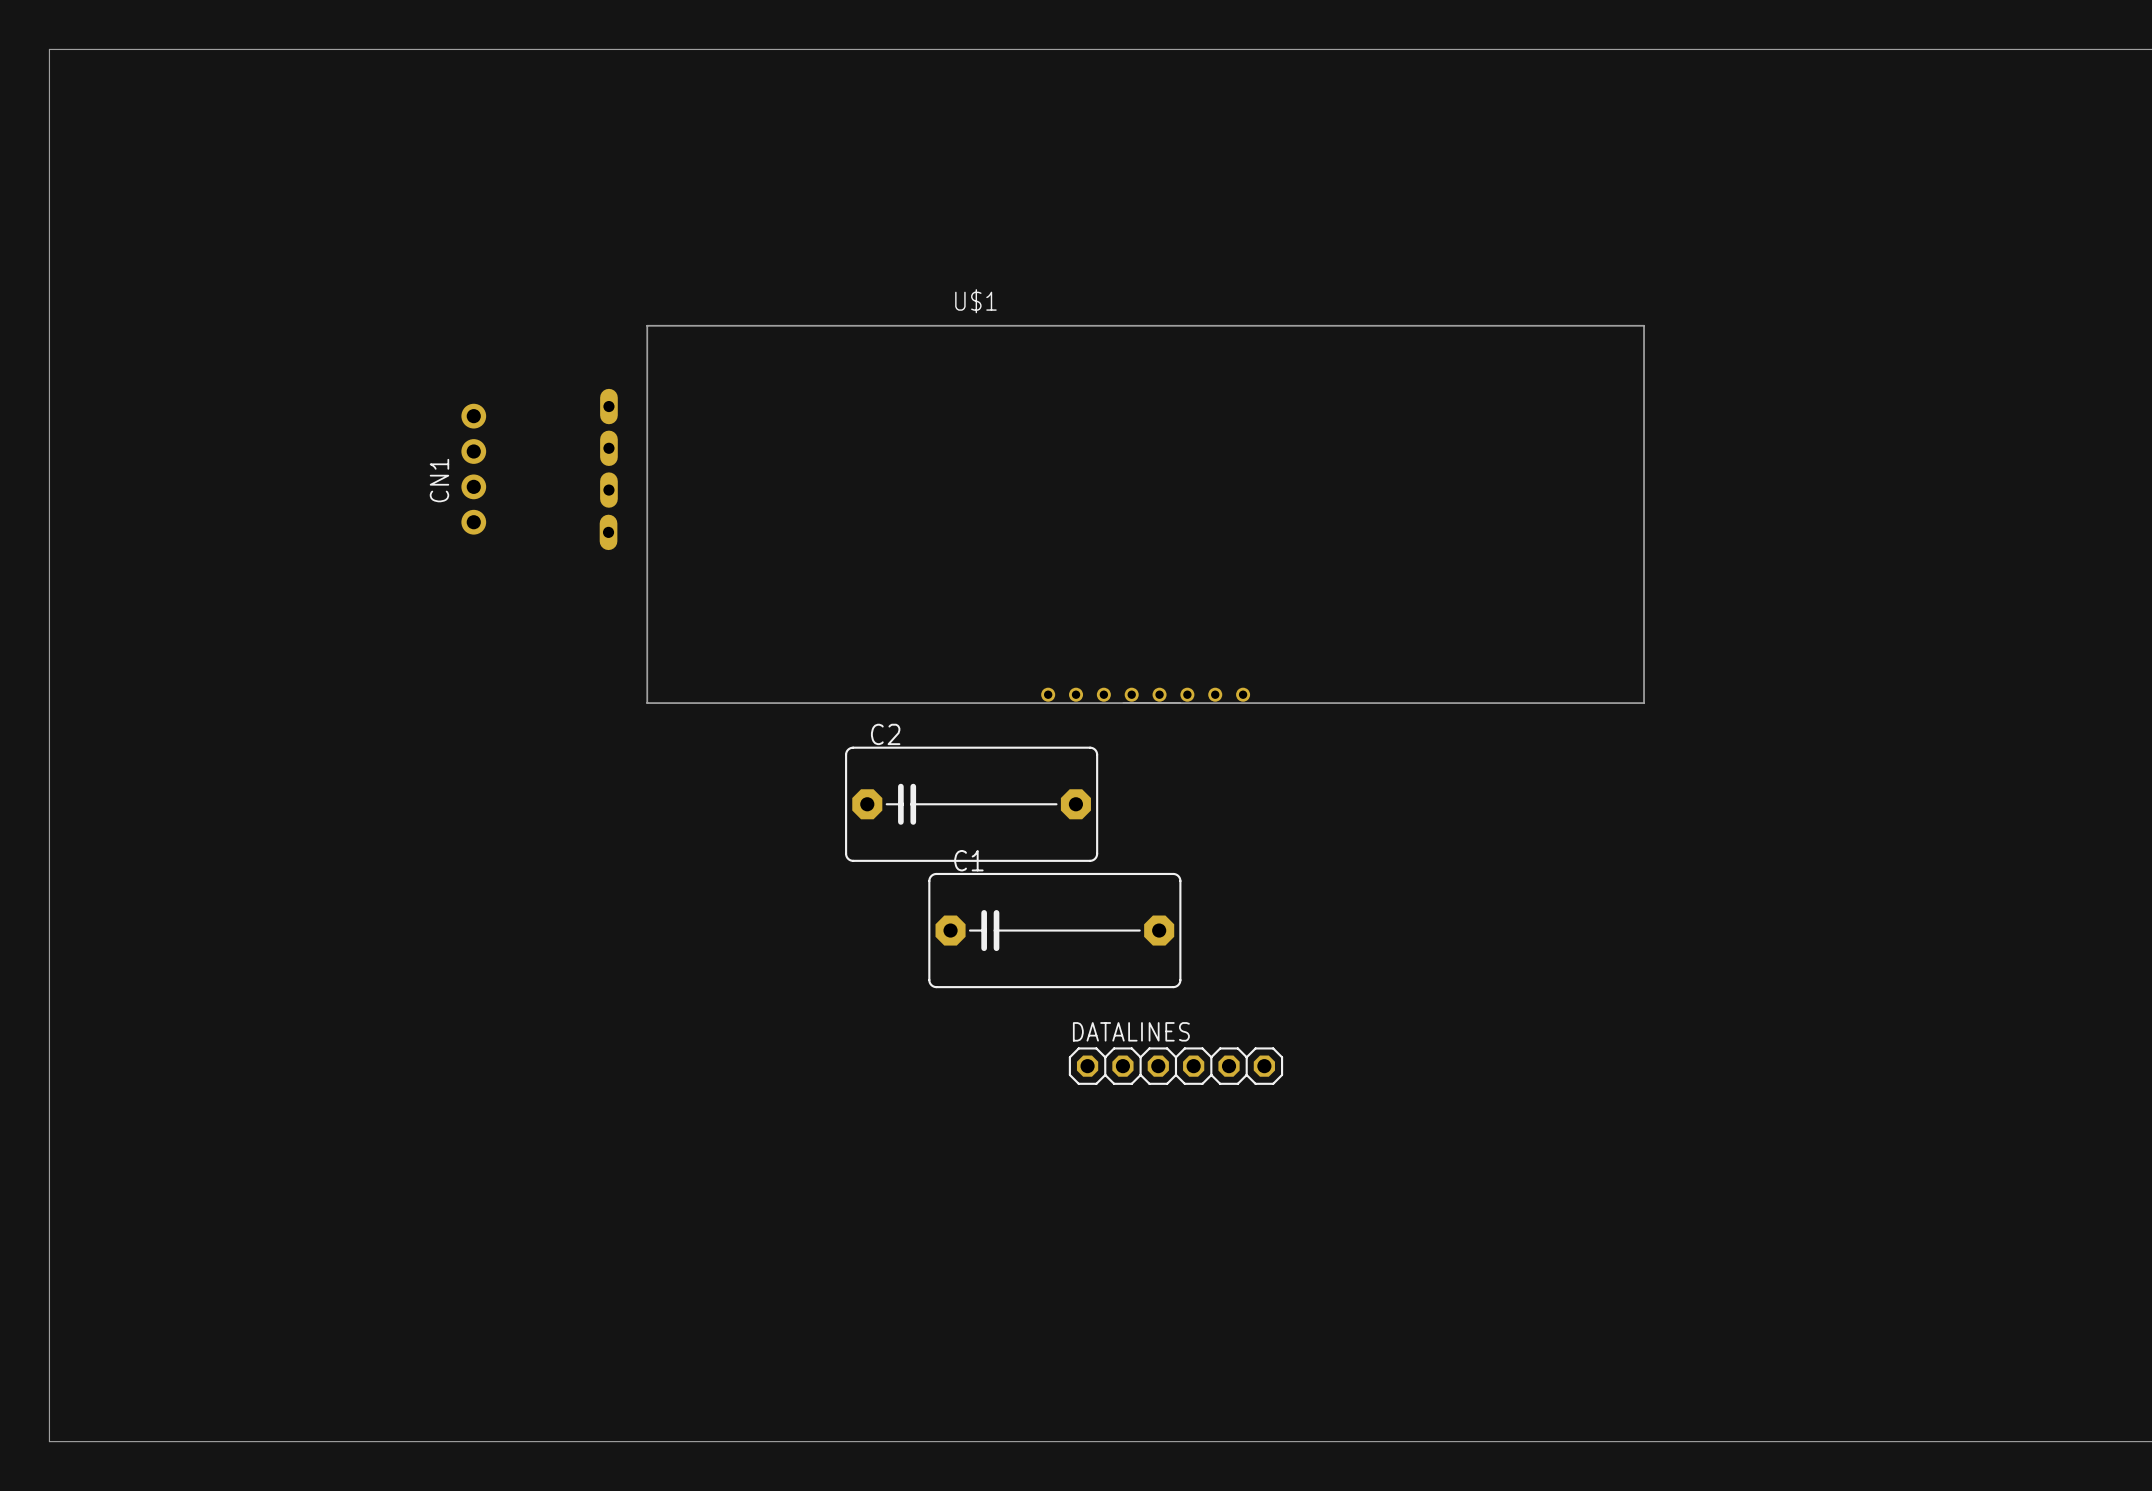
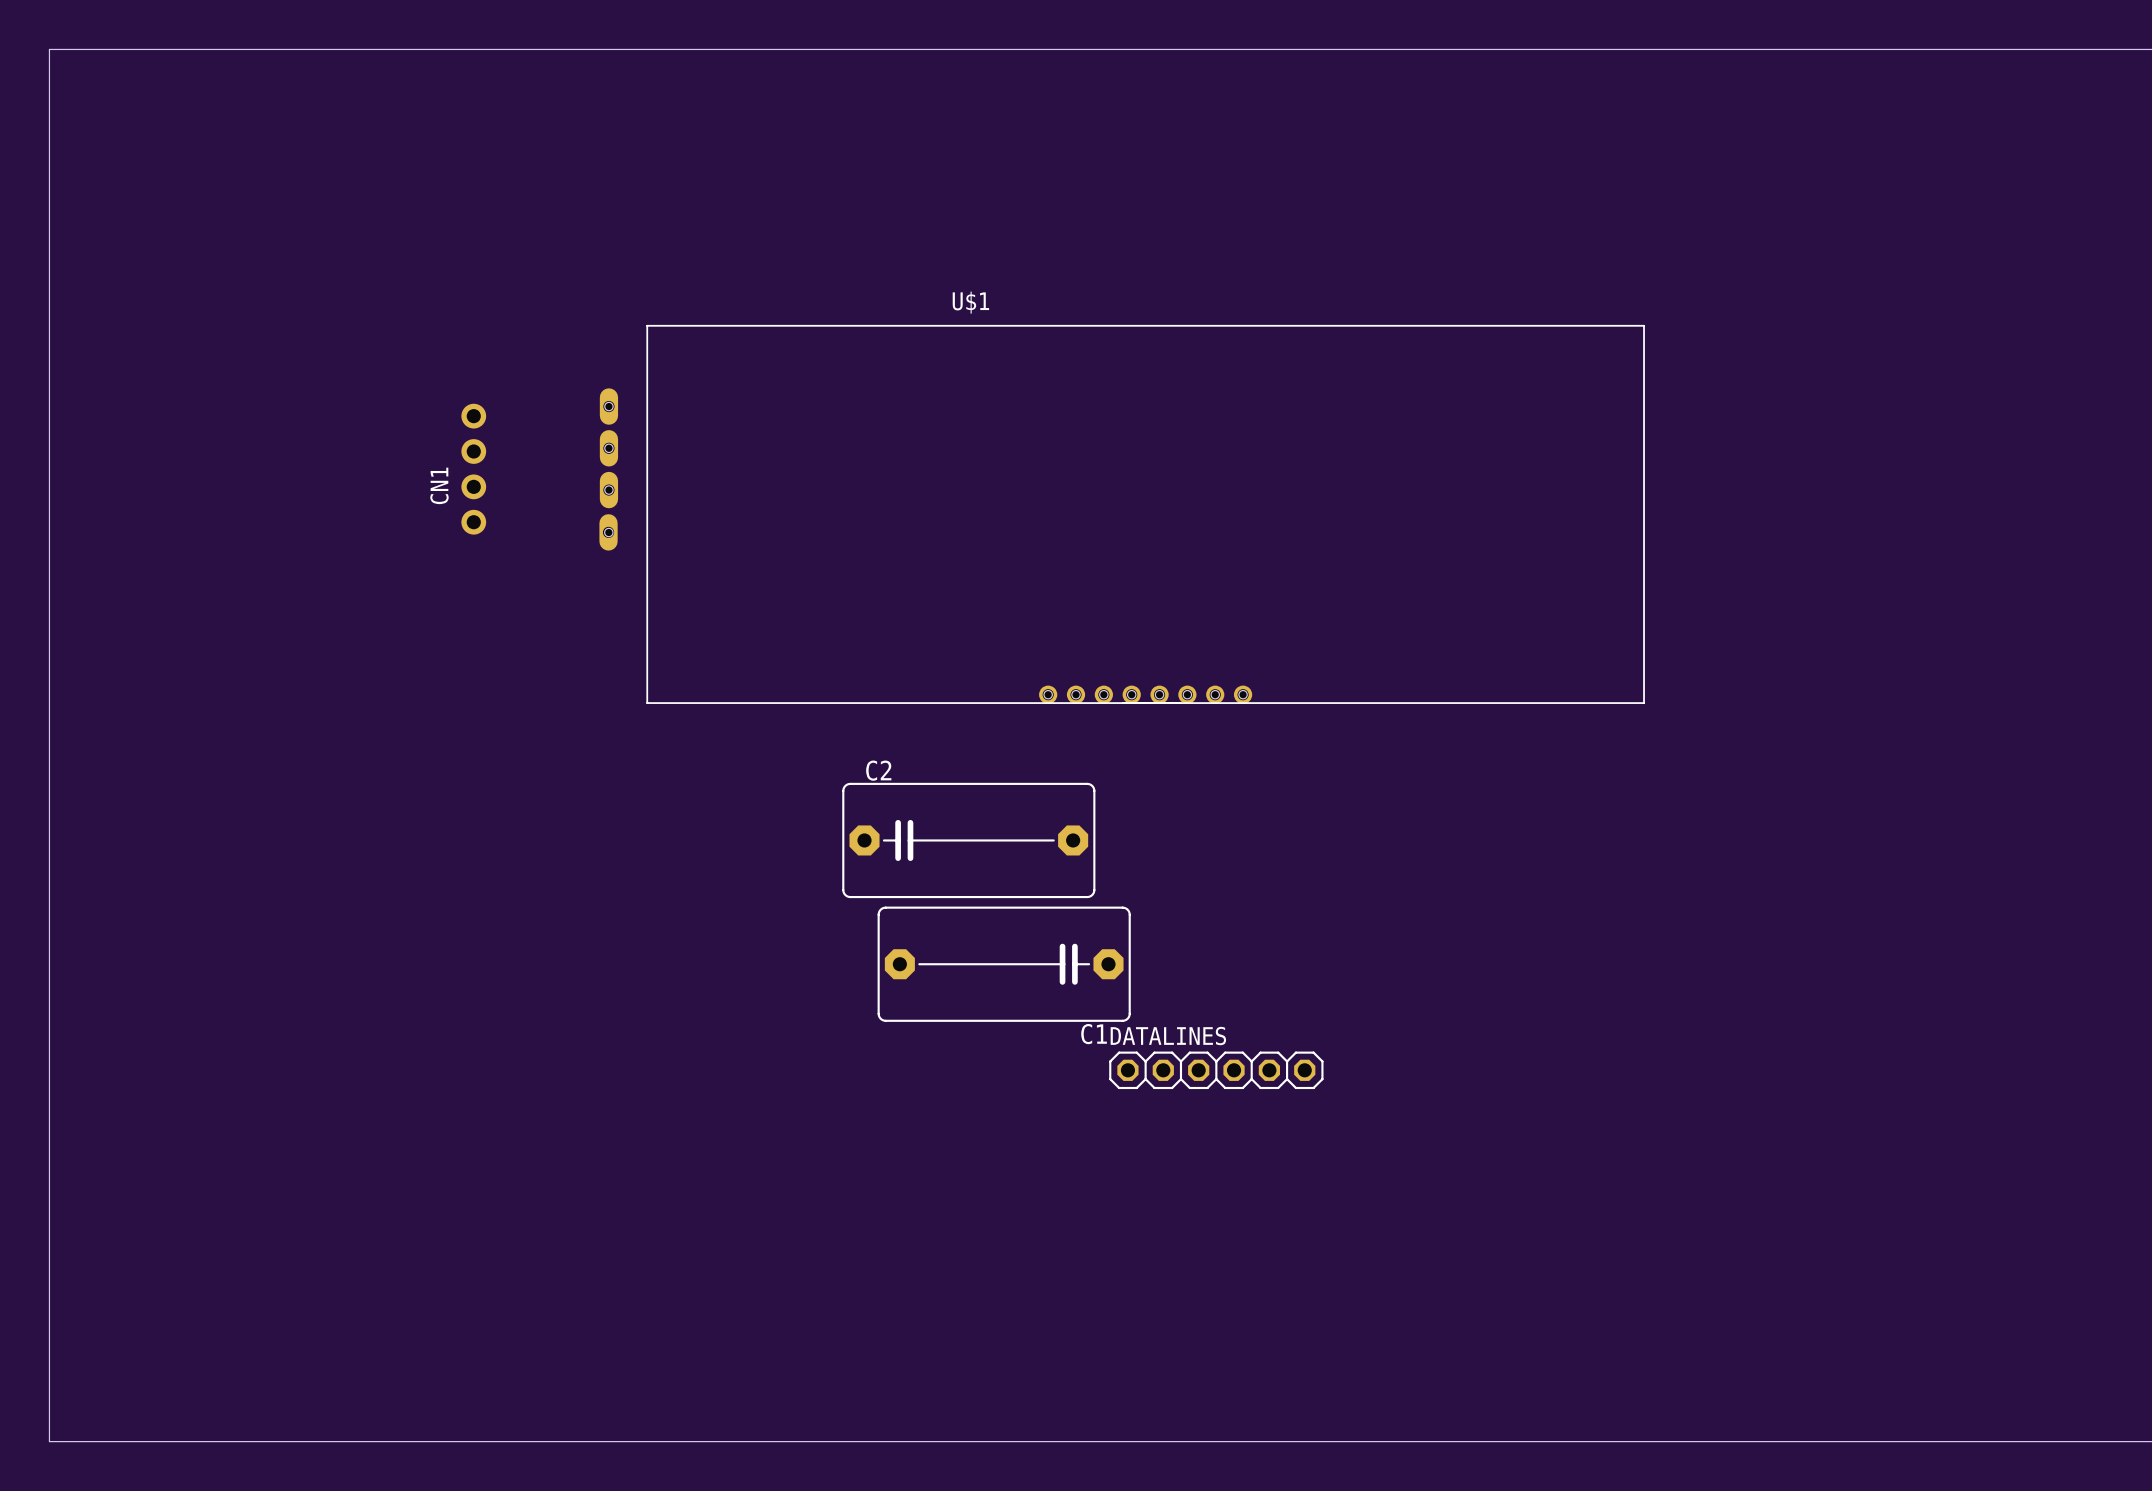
U$1 footprint: [599, 324, 1645, 704] -> [599, 324, 1645, 704]
C2 position: (971, 804) -> (968, 840)
C1 rotation: 0° (1054, 930) -> 180° (1004, 964)
DATALINES position: (1175, 1066) -> (1216, 1070)

